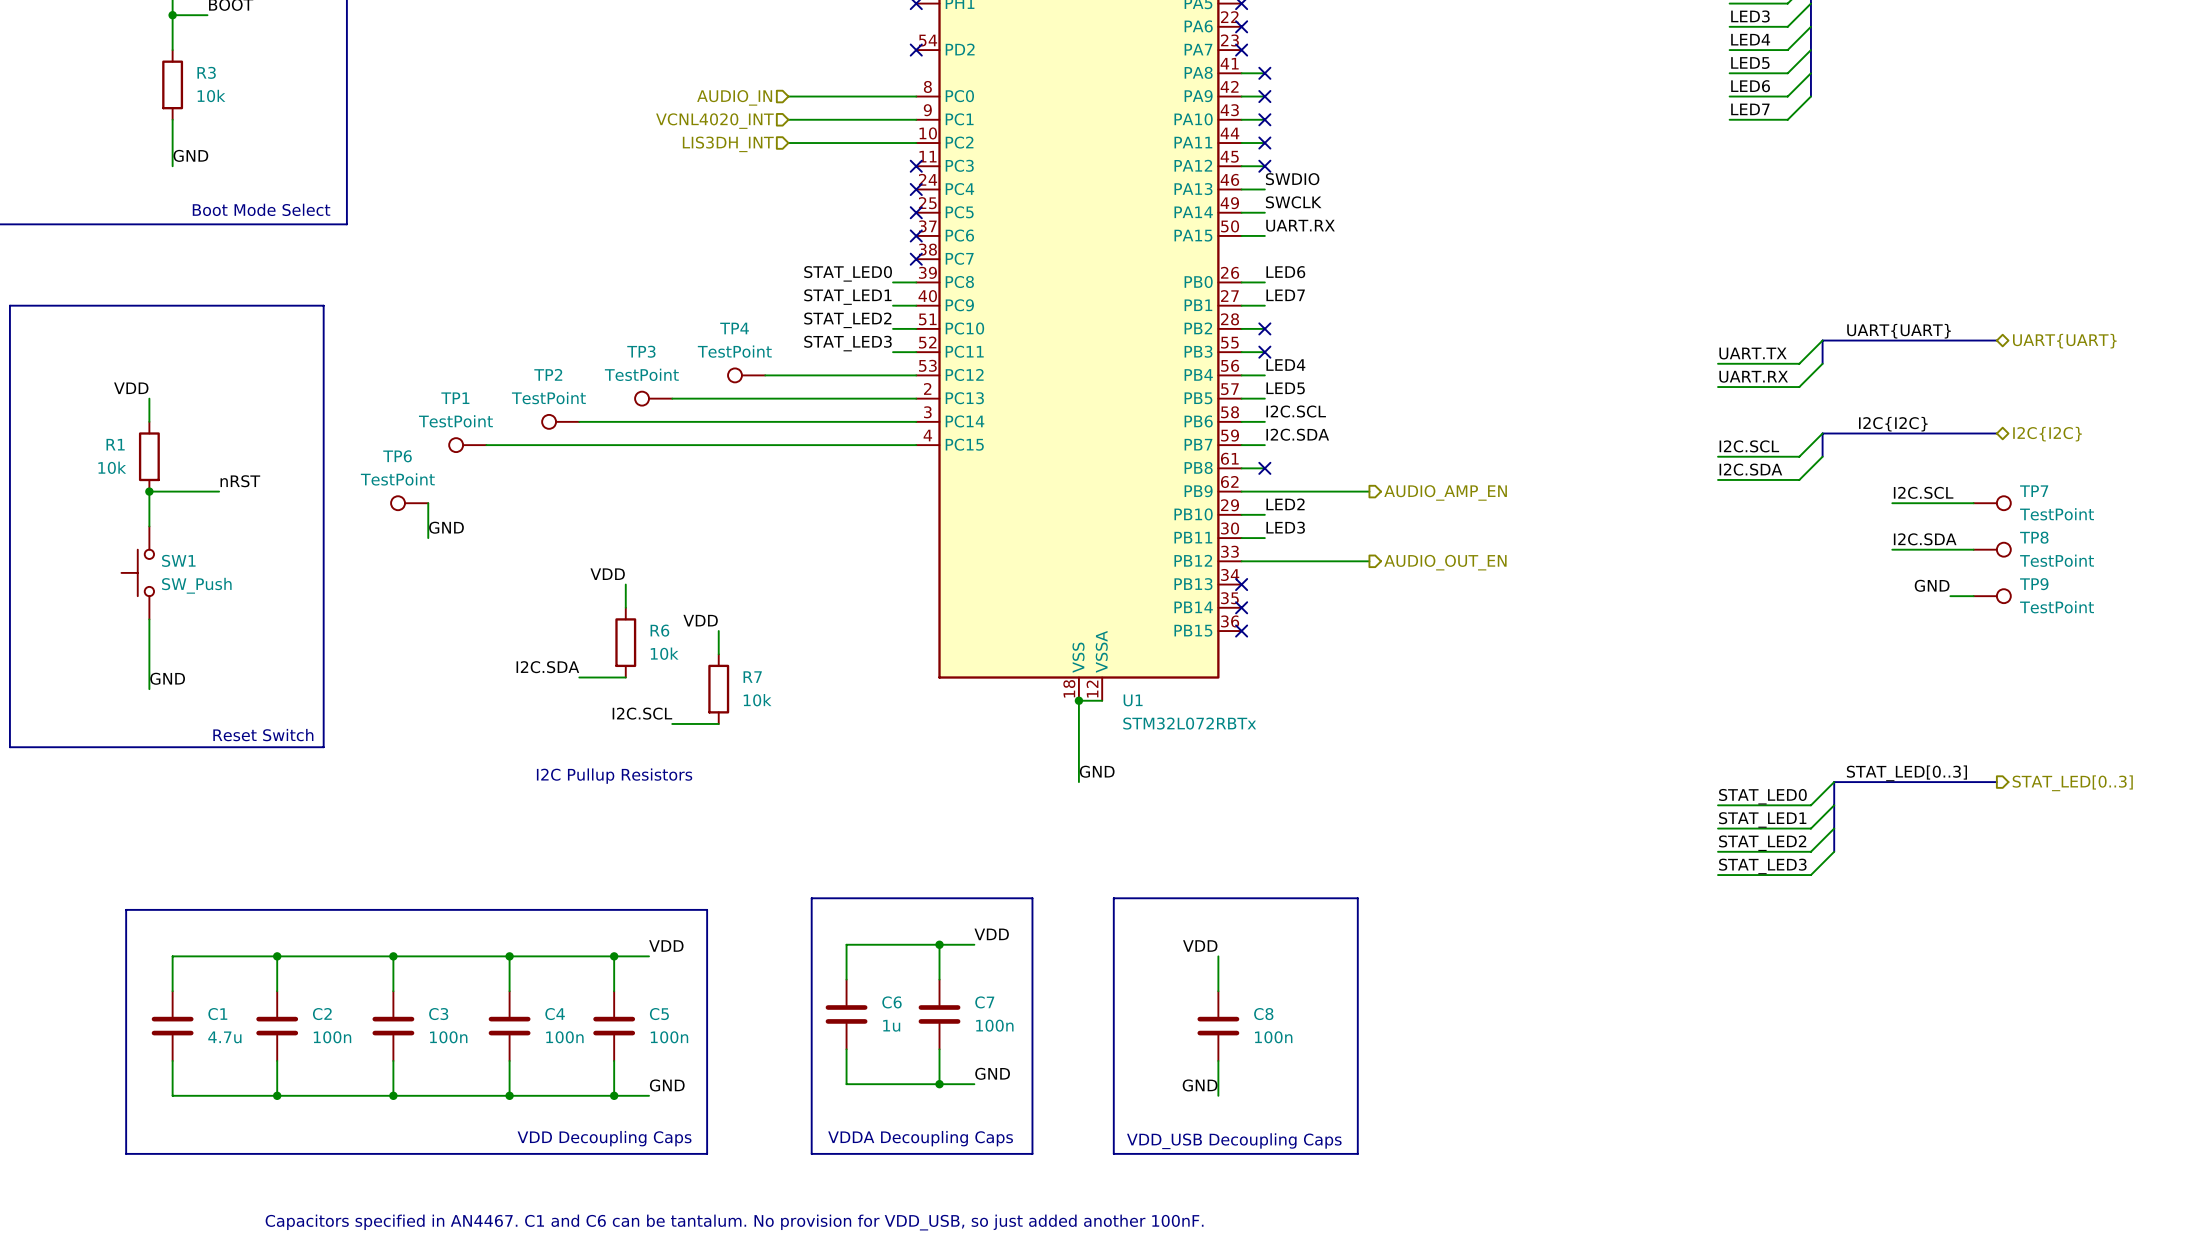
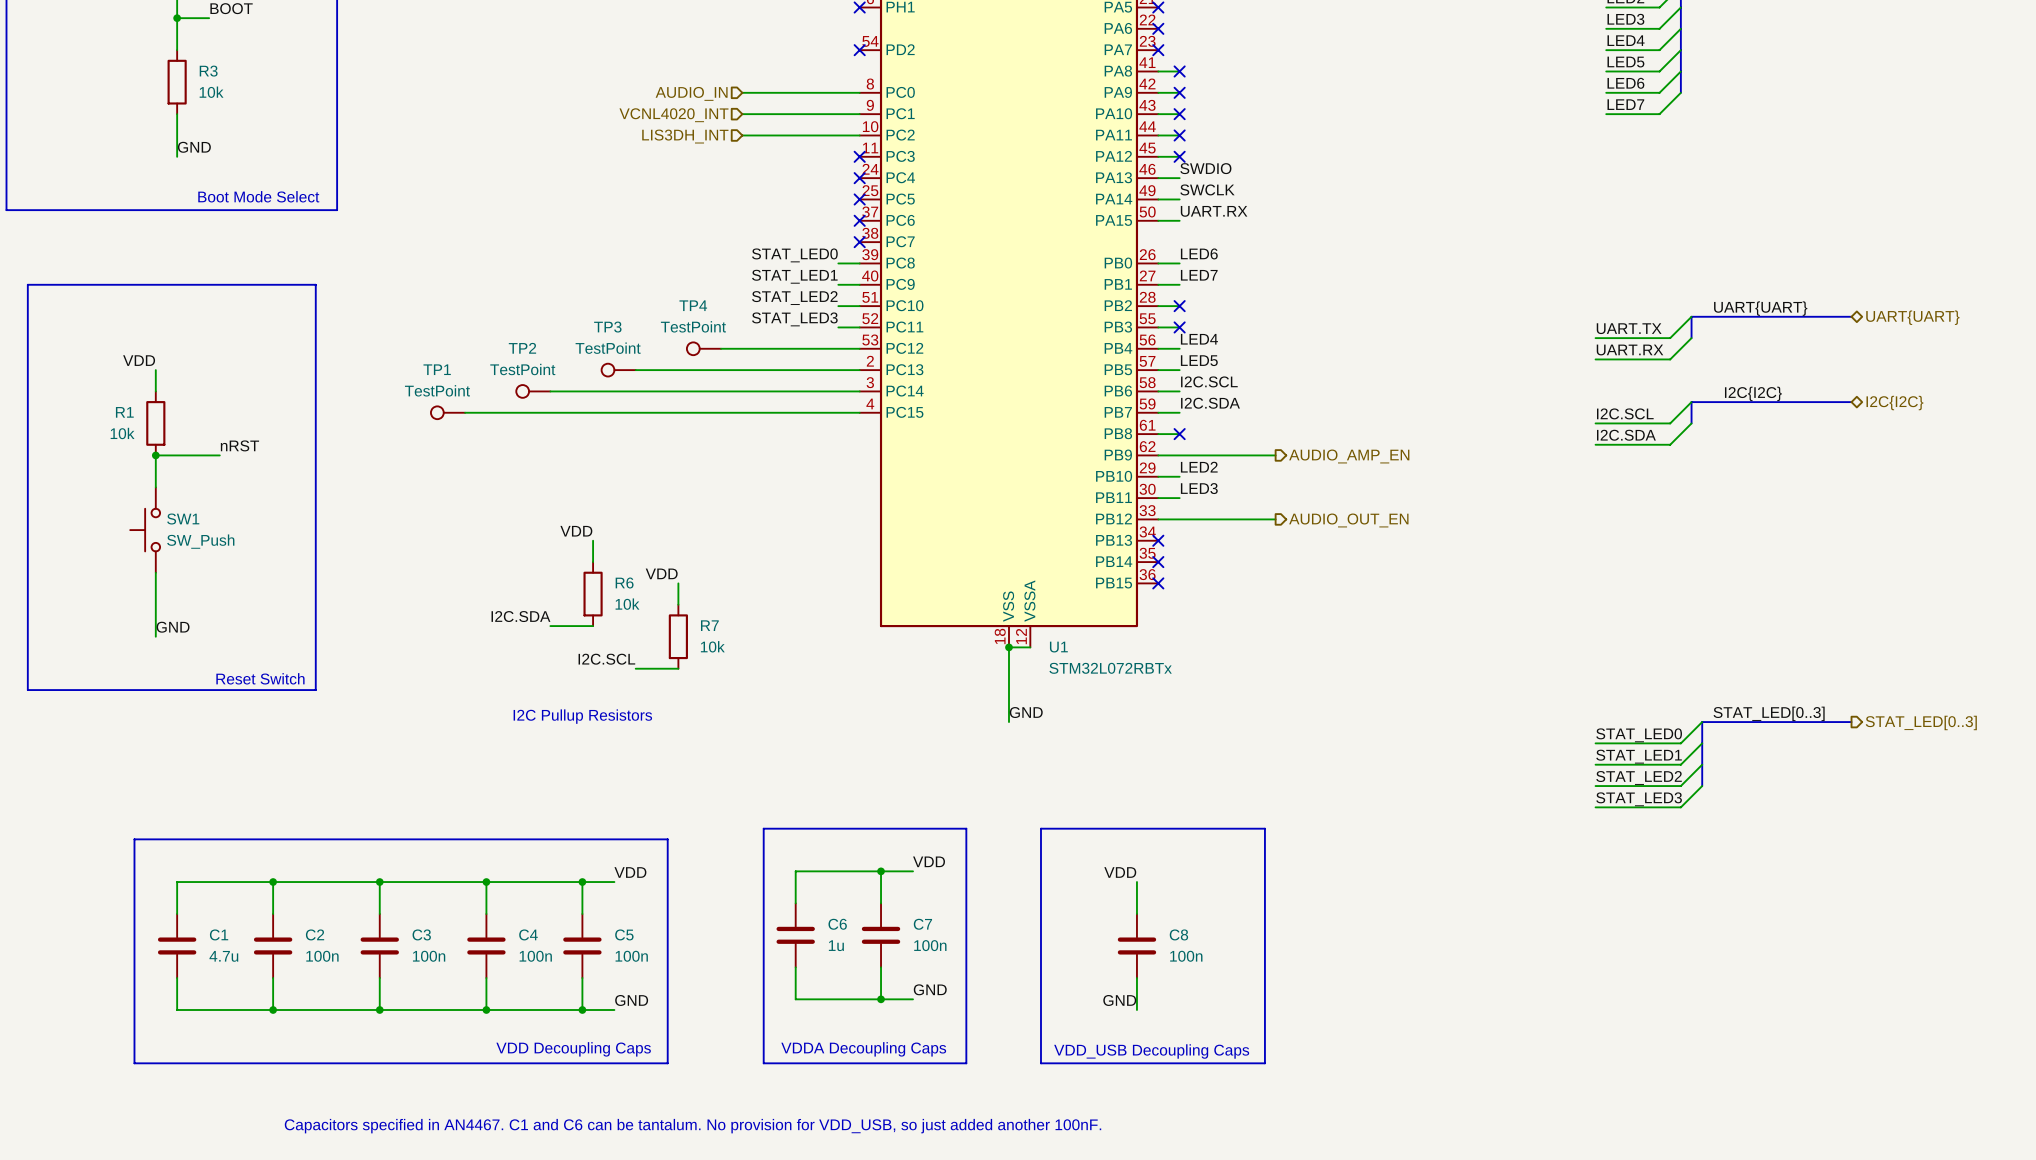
label: I2C.SCL (1923, 492) -> none
TP6: TestPoint (409, 503) -> none
wire: (428, 503) (428, 538) -> none
wire: (1892, 503) (1973, 503) -> none
TP7: TestPoint (1992, 503) -> none
label: GND (446, 527) -> none
label: I2C.SDA (1925, 539) -> none
wire: (1892, 549) (1973, 549) -> none
TP8: TestPoint (1992, 549) -> none
label: GND (1932, 585) -> none
wire: (1950, 596) (1973, 596) -> none
TP9: TestPoint (1992, 596) -> none

